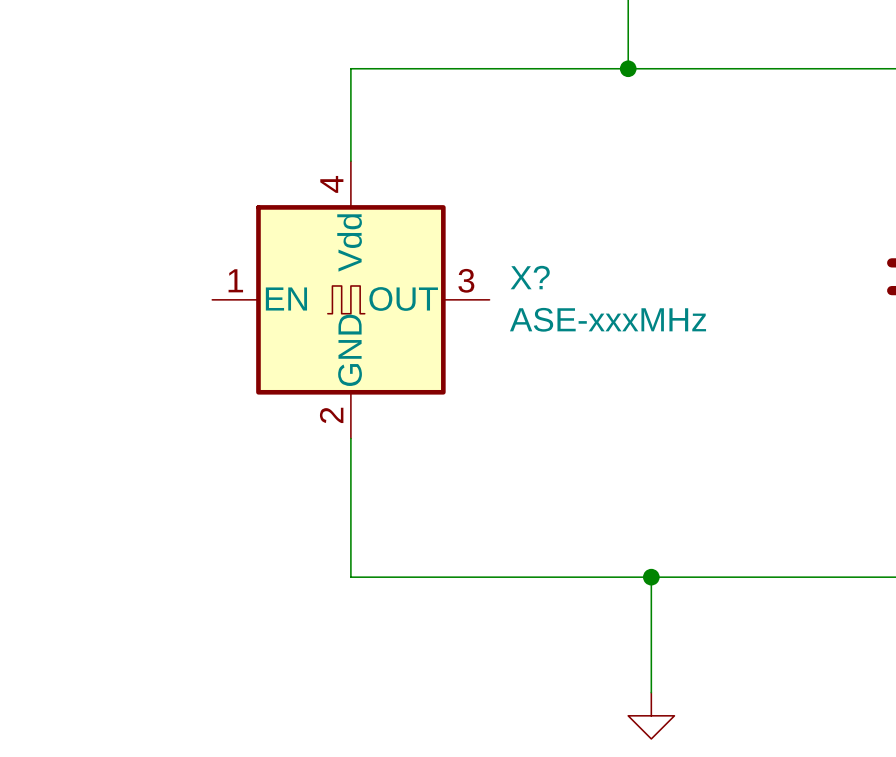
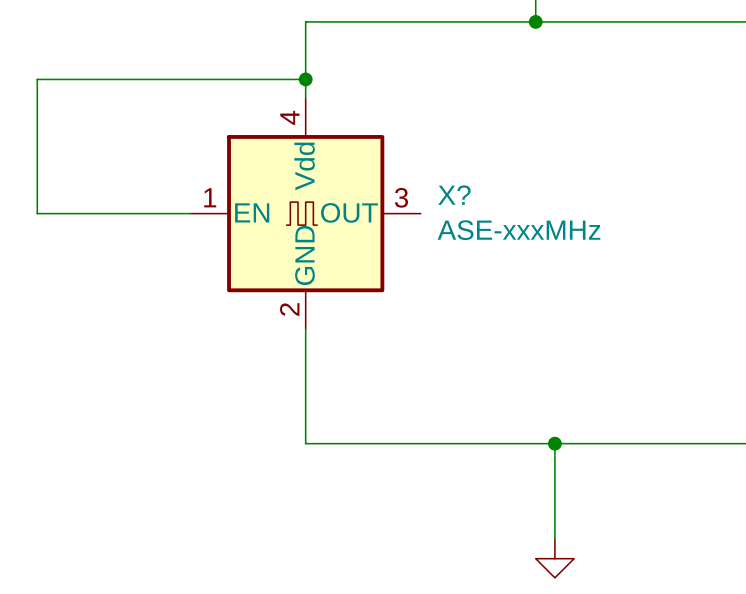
wire: none -> (305, 79) (37, 79) (37, 213) (190, 213)
junction: none -> (305, 79)

